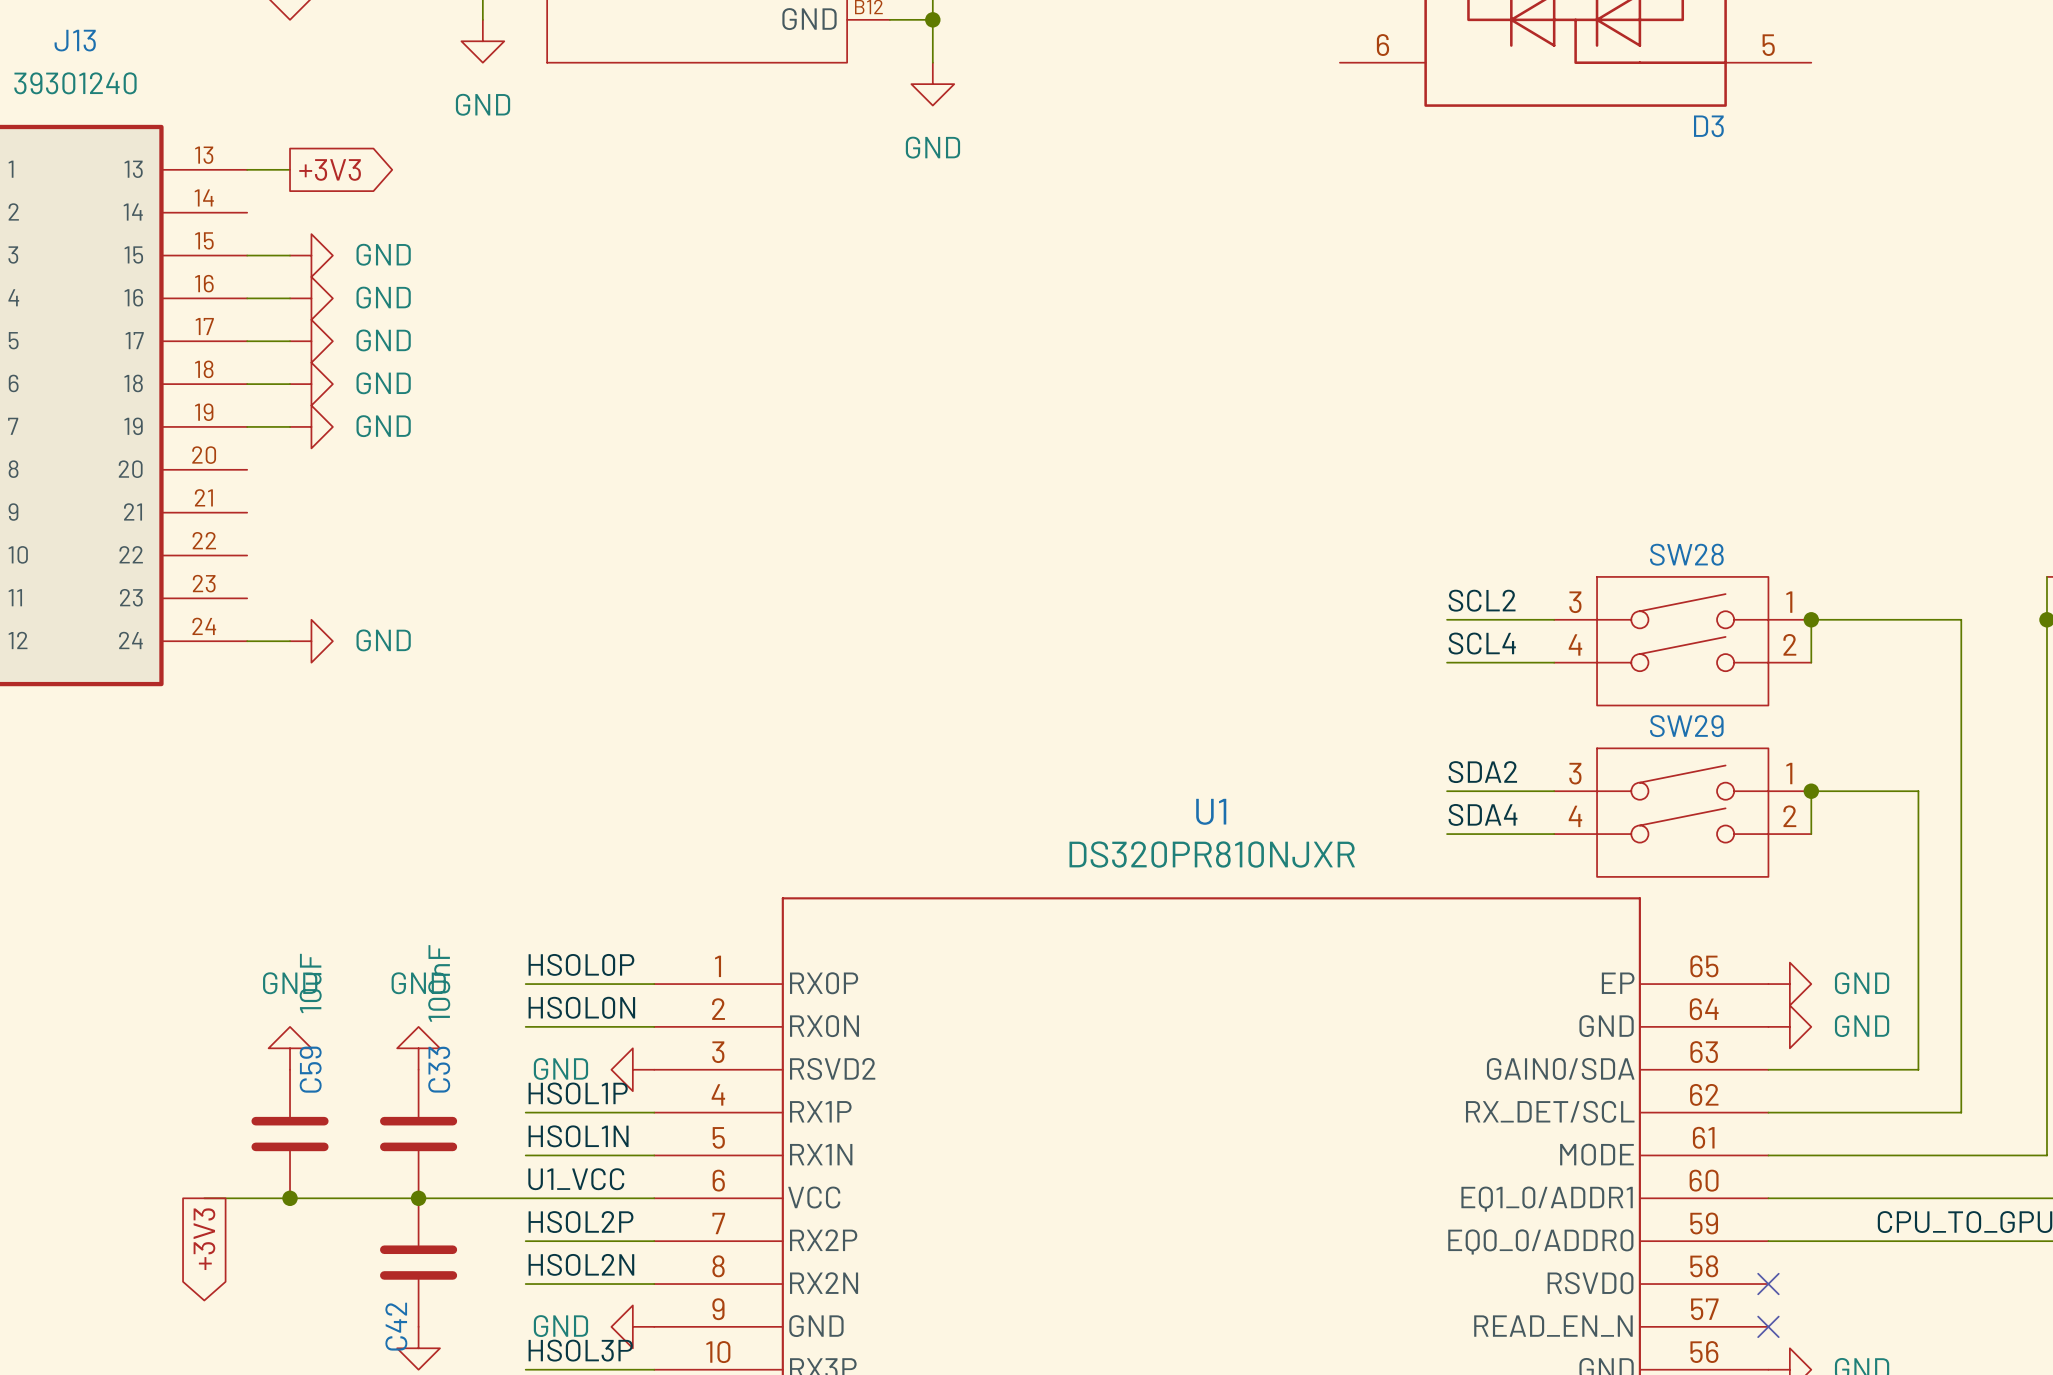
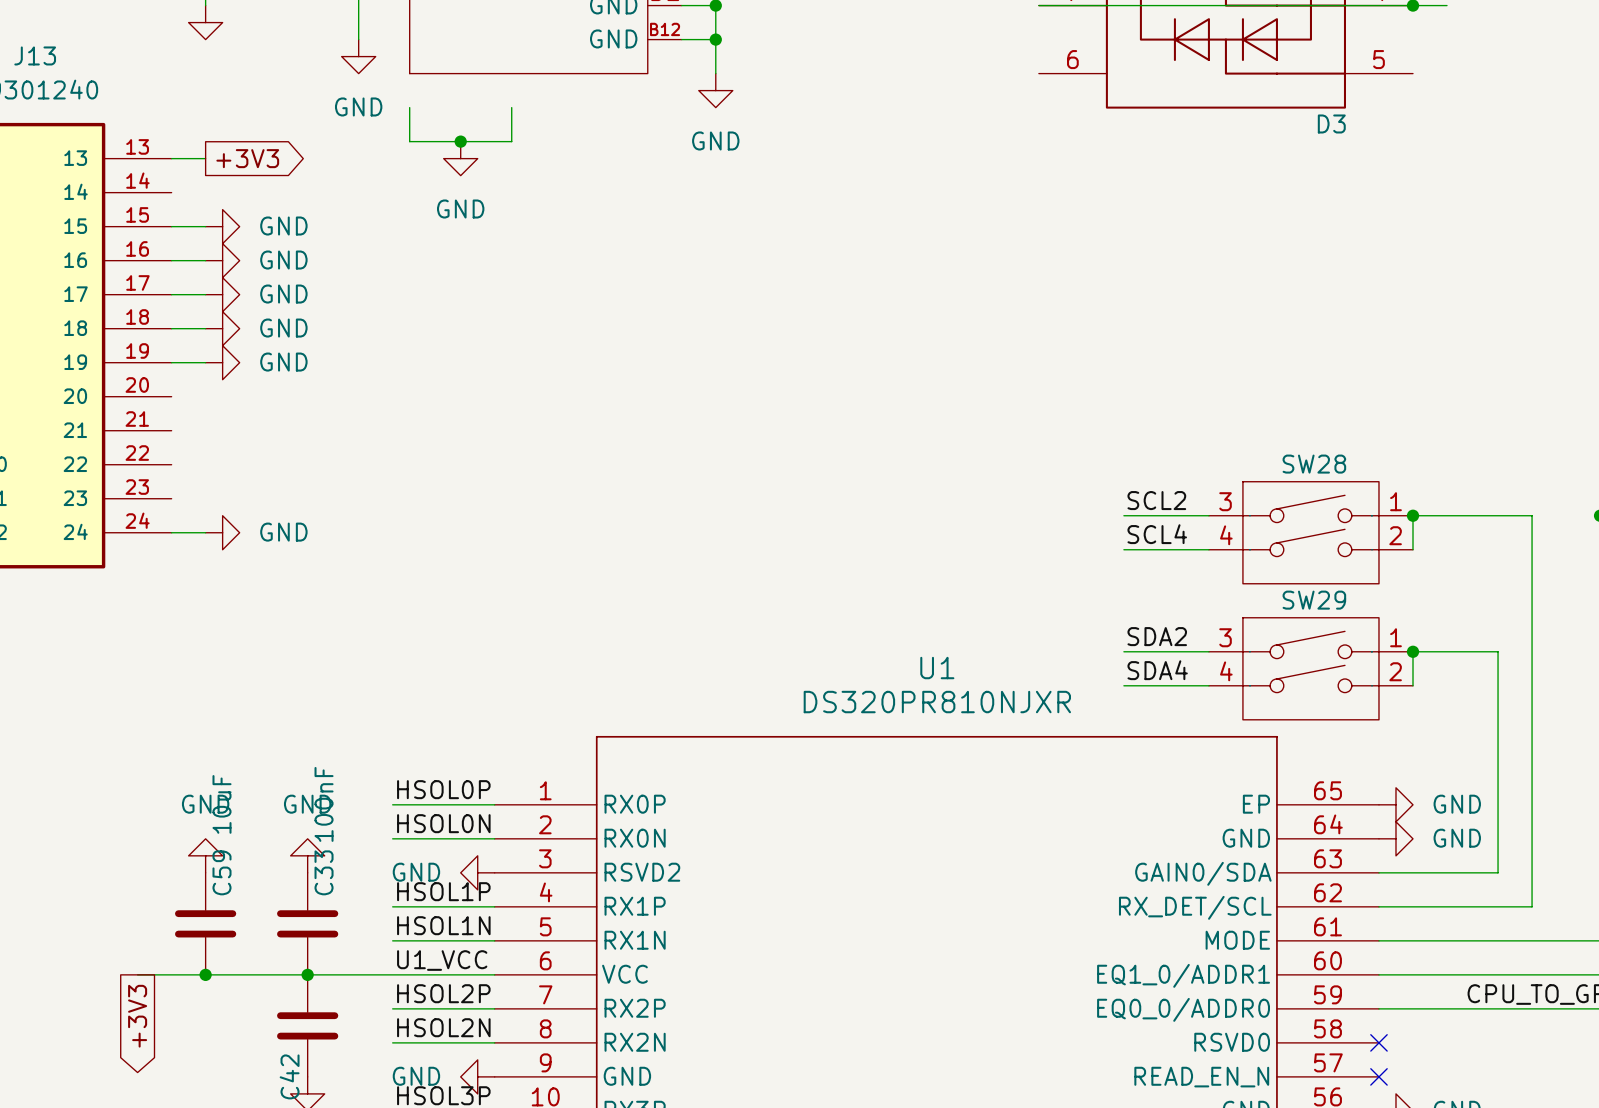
wire: none -> (409, 107) (409, 141) (511, 141) (511, 107)
junction: none -> (460, 141)
power symbol: none -> GND (460, 158)

